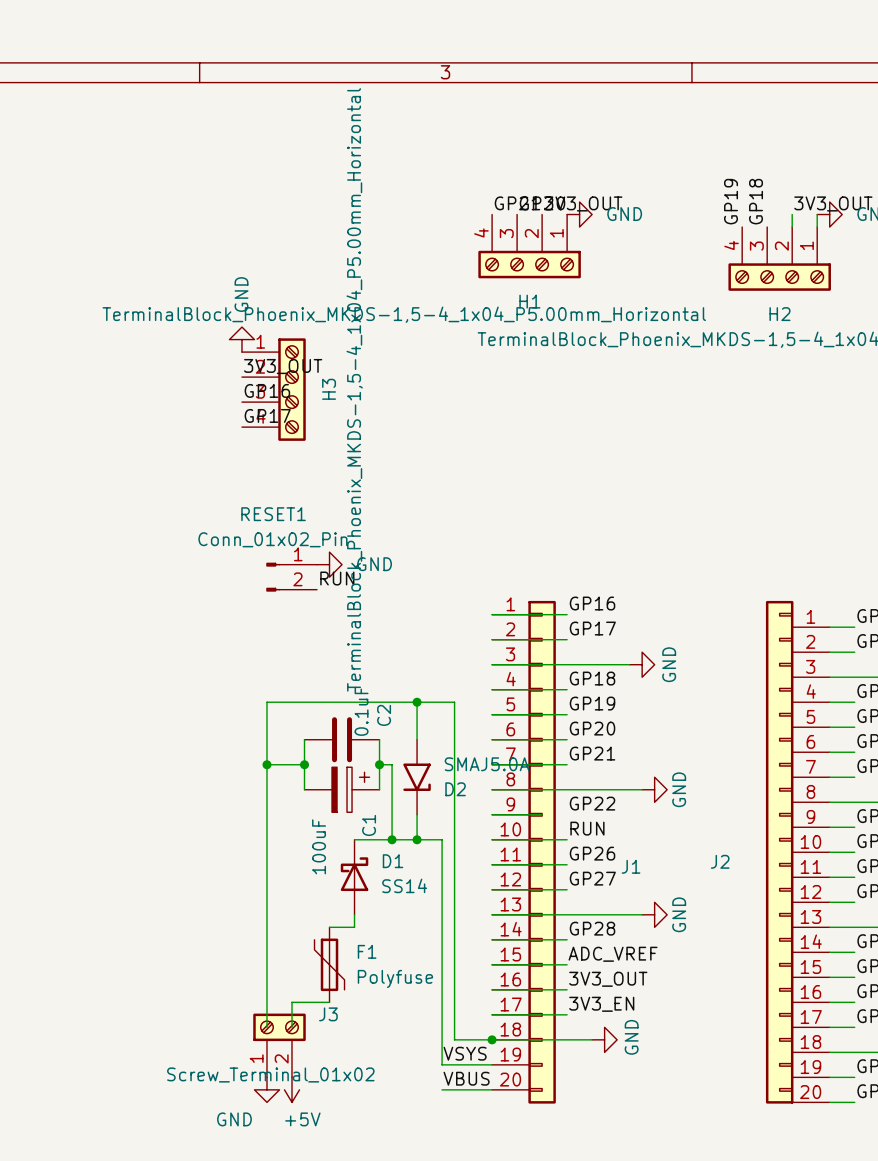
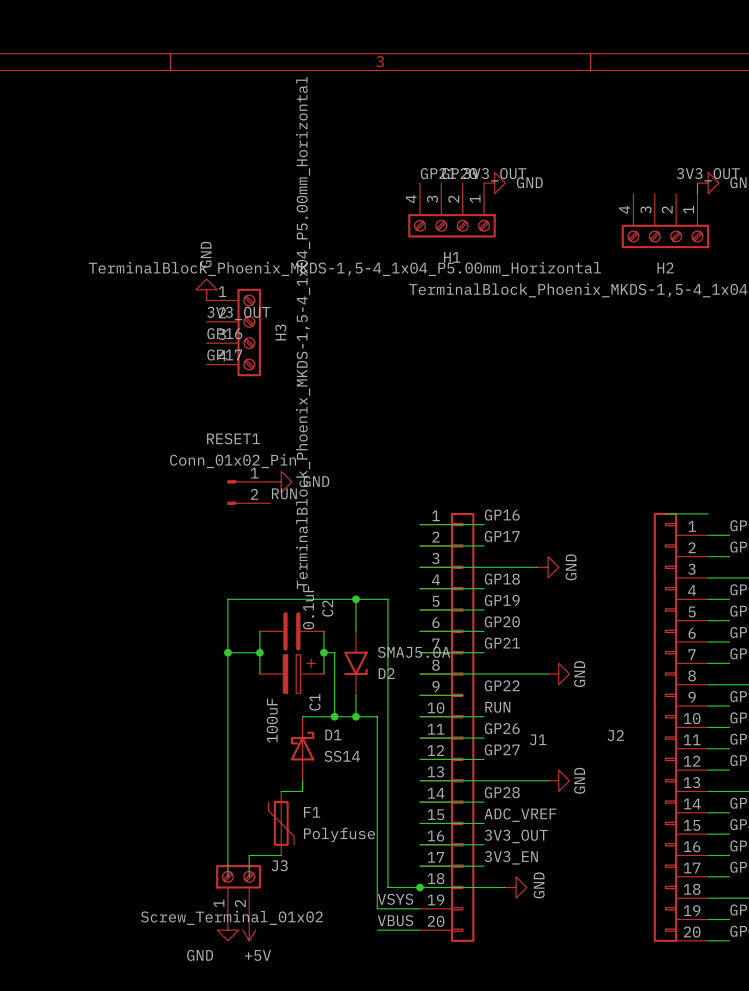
label: GP19 (731, 201) -> none
label: GP18 (756, 201) -> none
wire: (792, 214) (792, 227) -> none
wire: none -> (665, 513) (708, 513)

